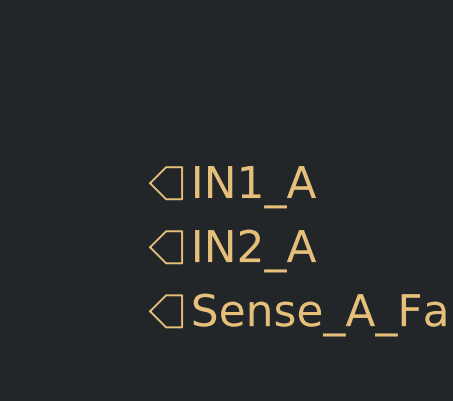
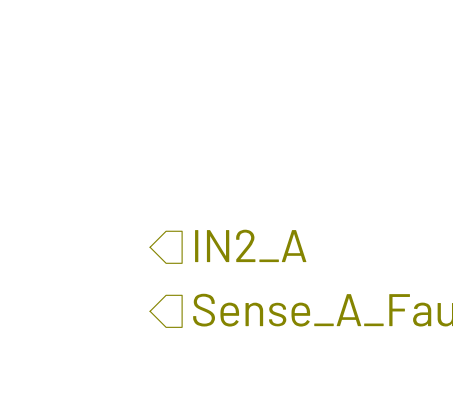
hierarchical label: IN1_A (255, 187) -> none

